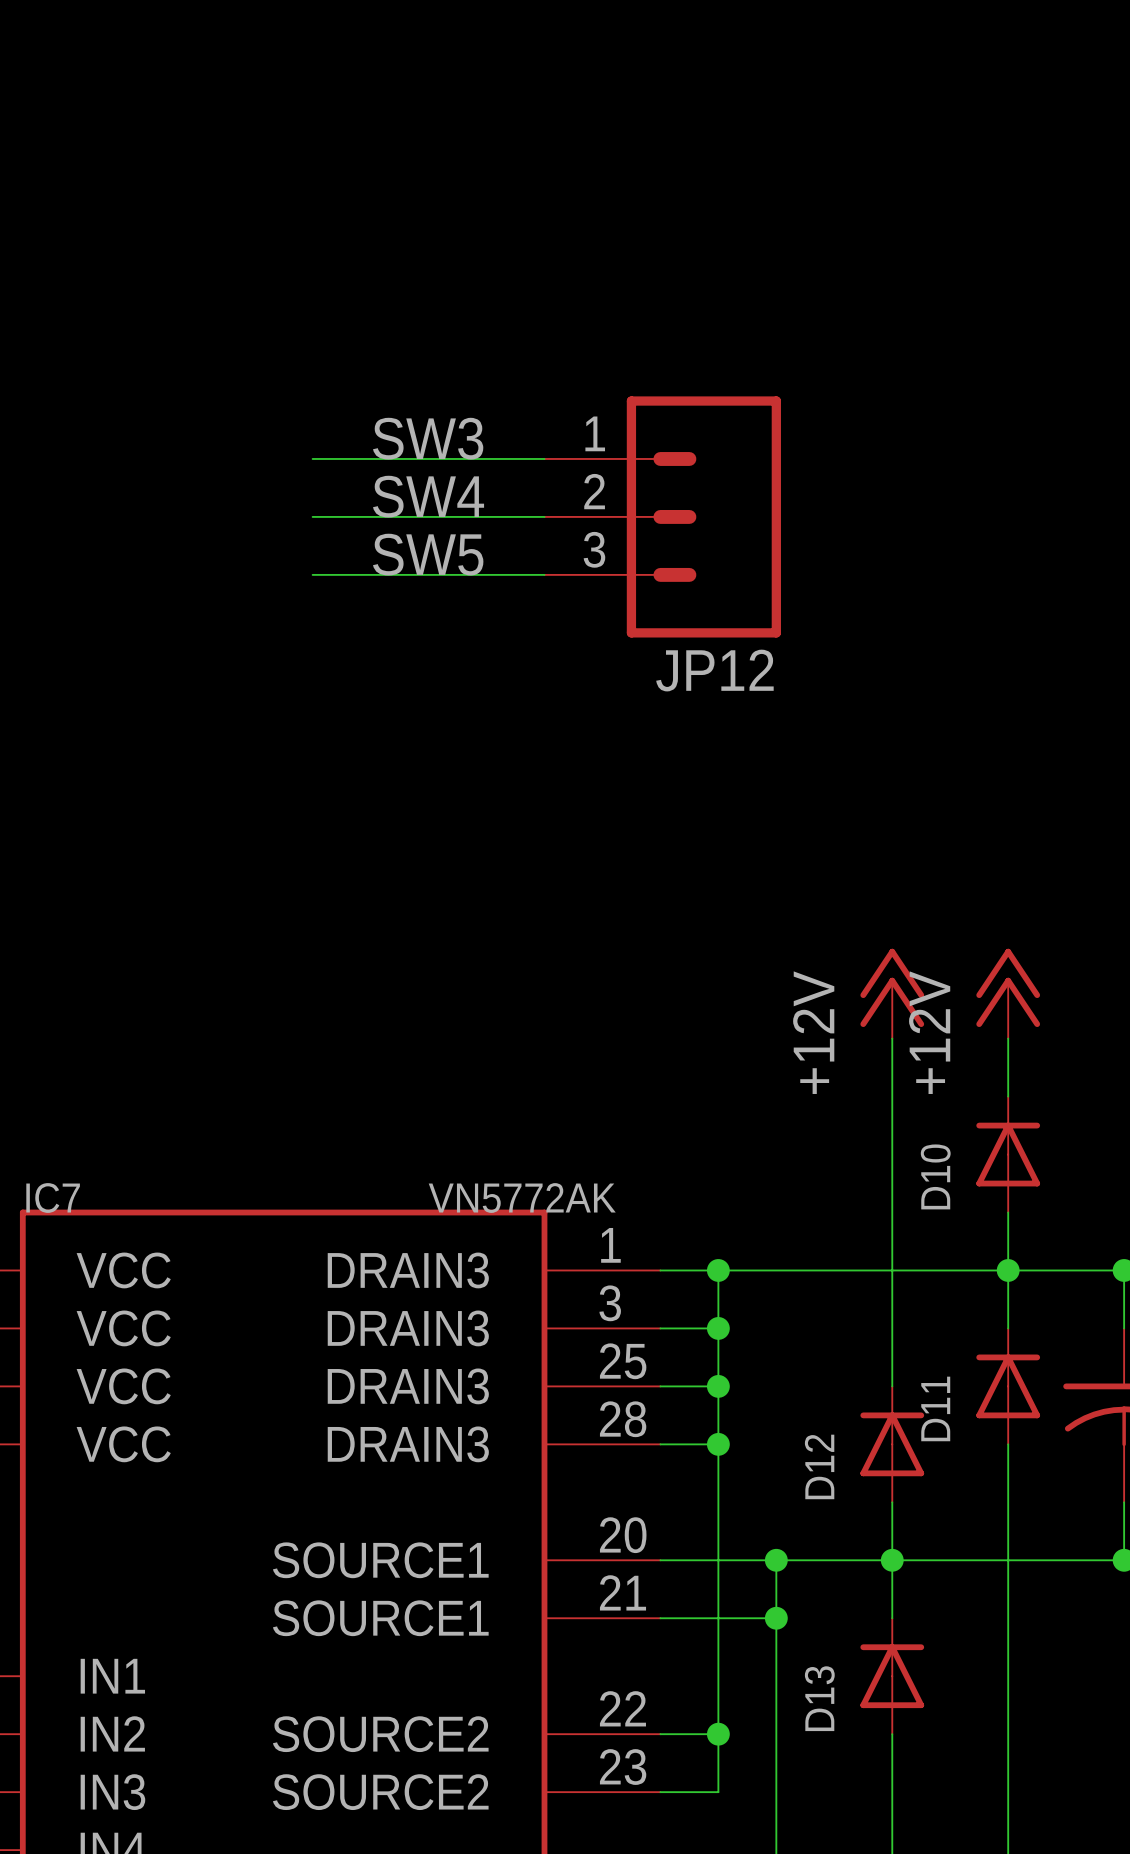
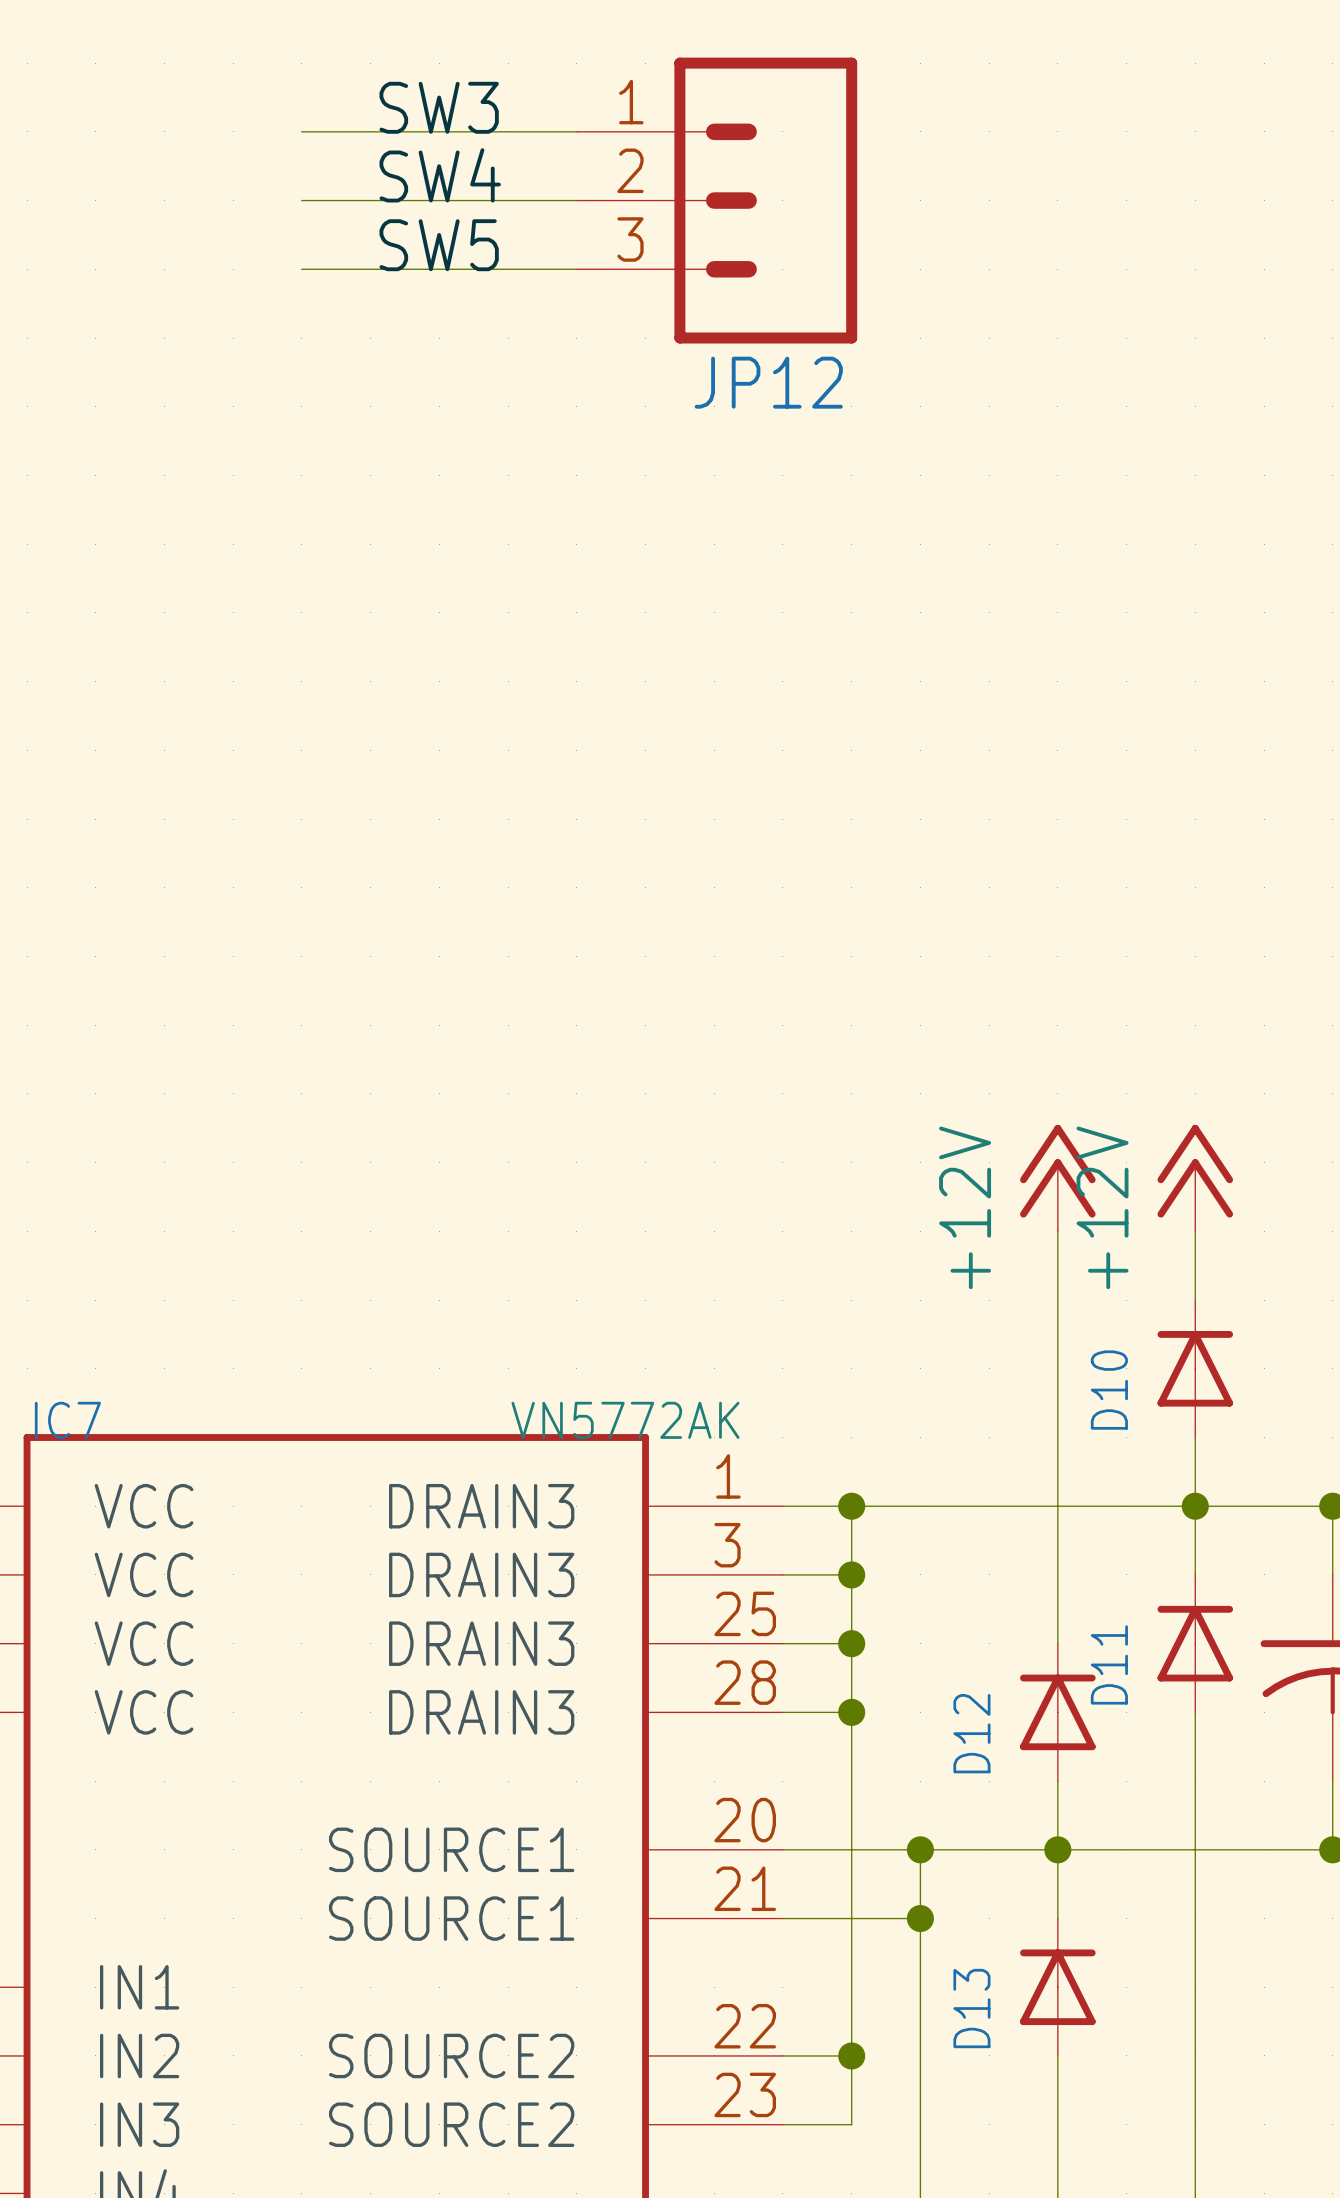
label position: SW3 (428, 438) -> SW3 (439, 107)
wire: (312, 458) (544, 458) -> (301, 131) (576, 131)
label position: SW4 (428, 496) -> SW4 (440, 175)
wire: (312, 516) (544, 516) -> (301, 200) (576, 200)
JP12 position: (662, 516) -> (716, 200)
label position: SW5 (428, 554) -> SW5 (439, 245)
wire: (312, 574) (544, 574) -> (301, 269) (576, 269)

